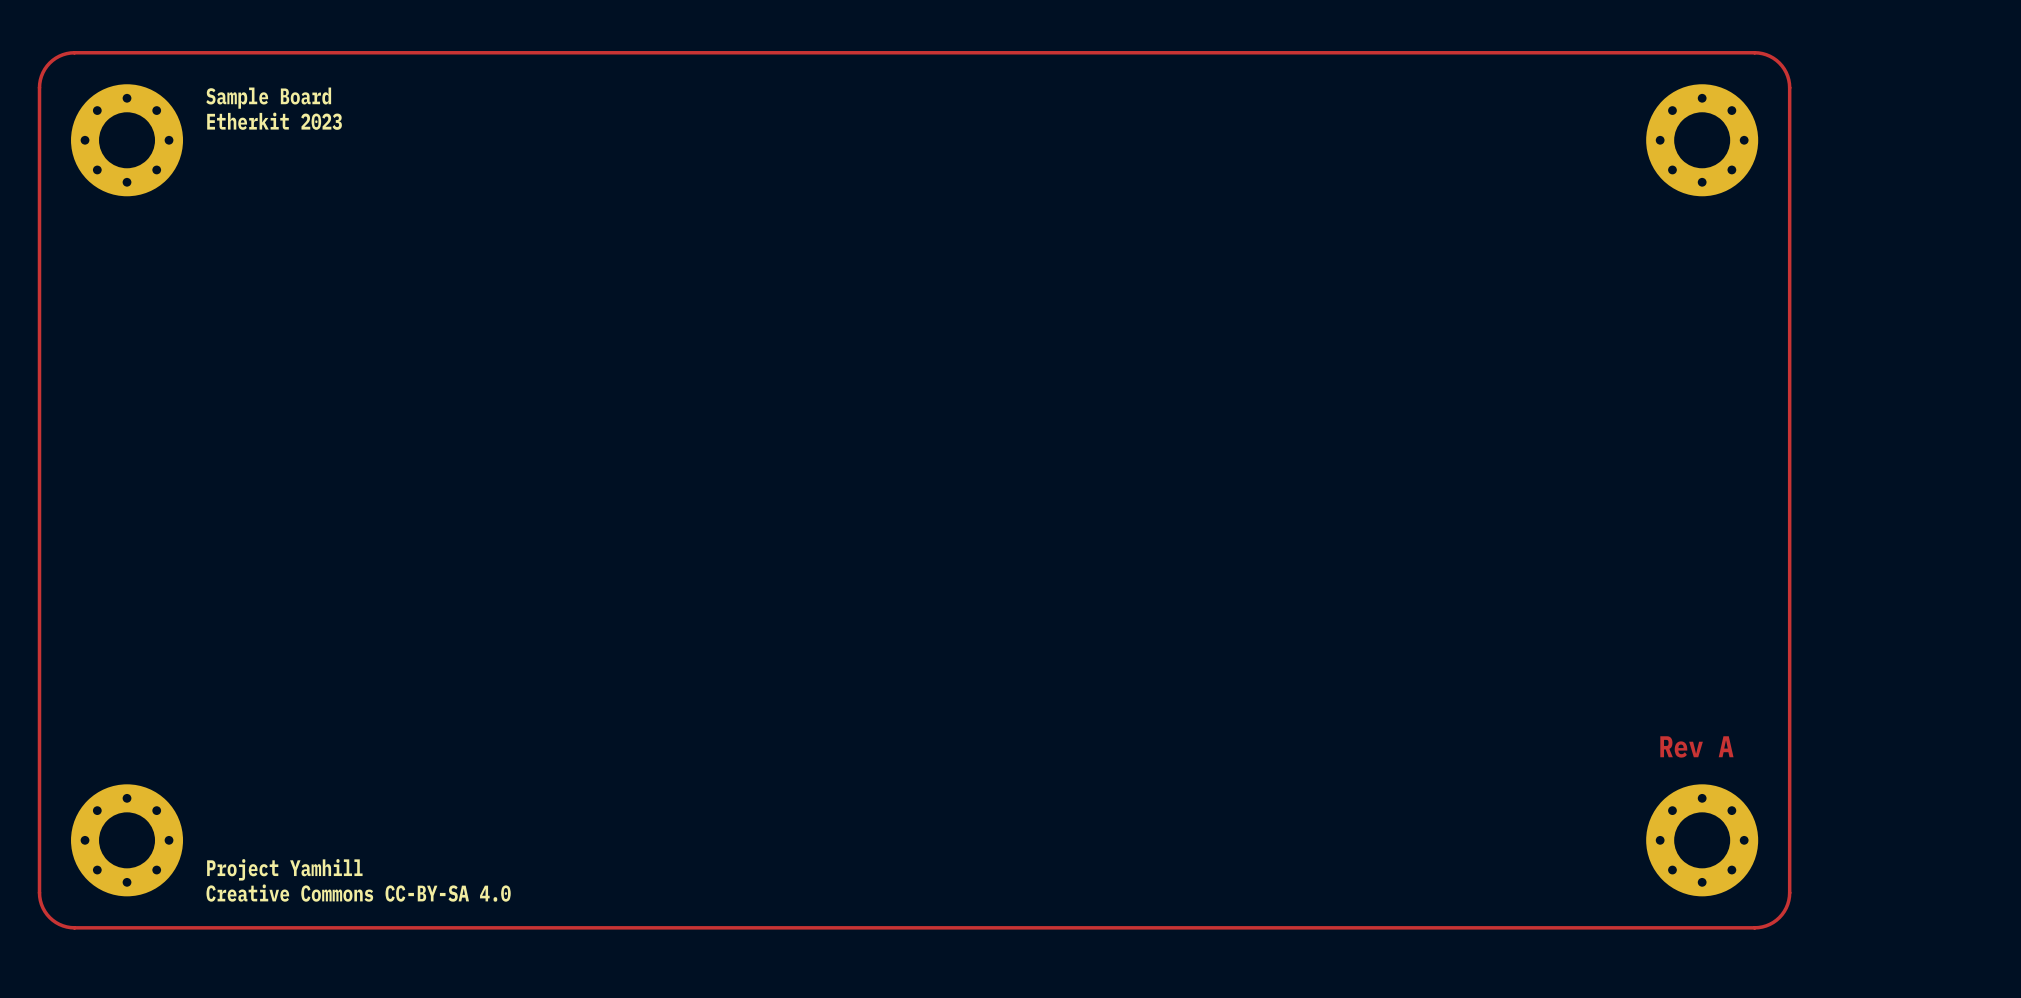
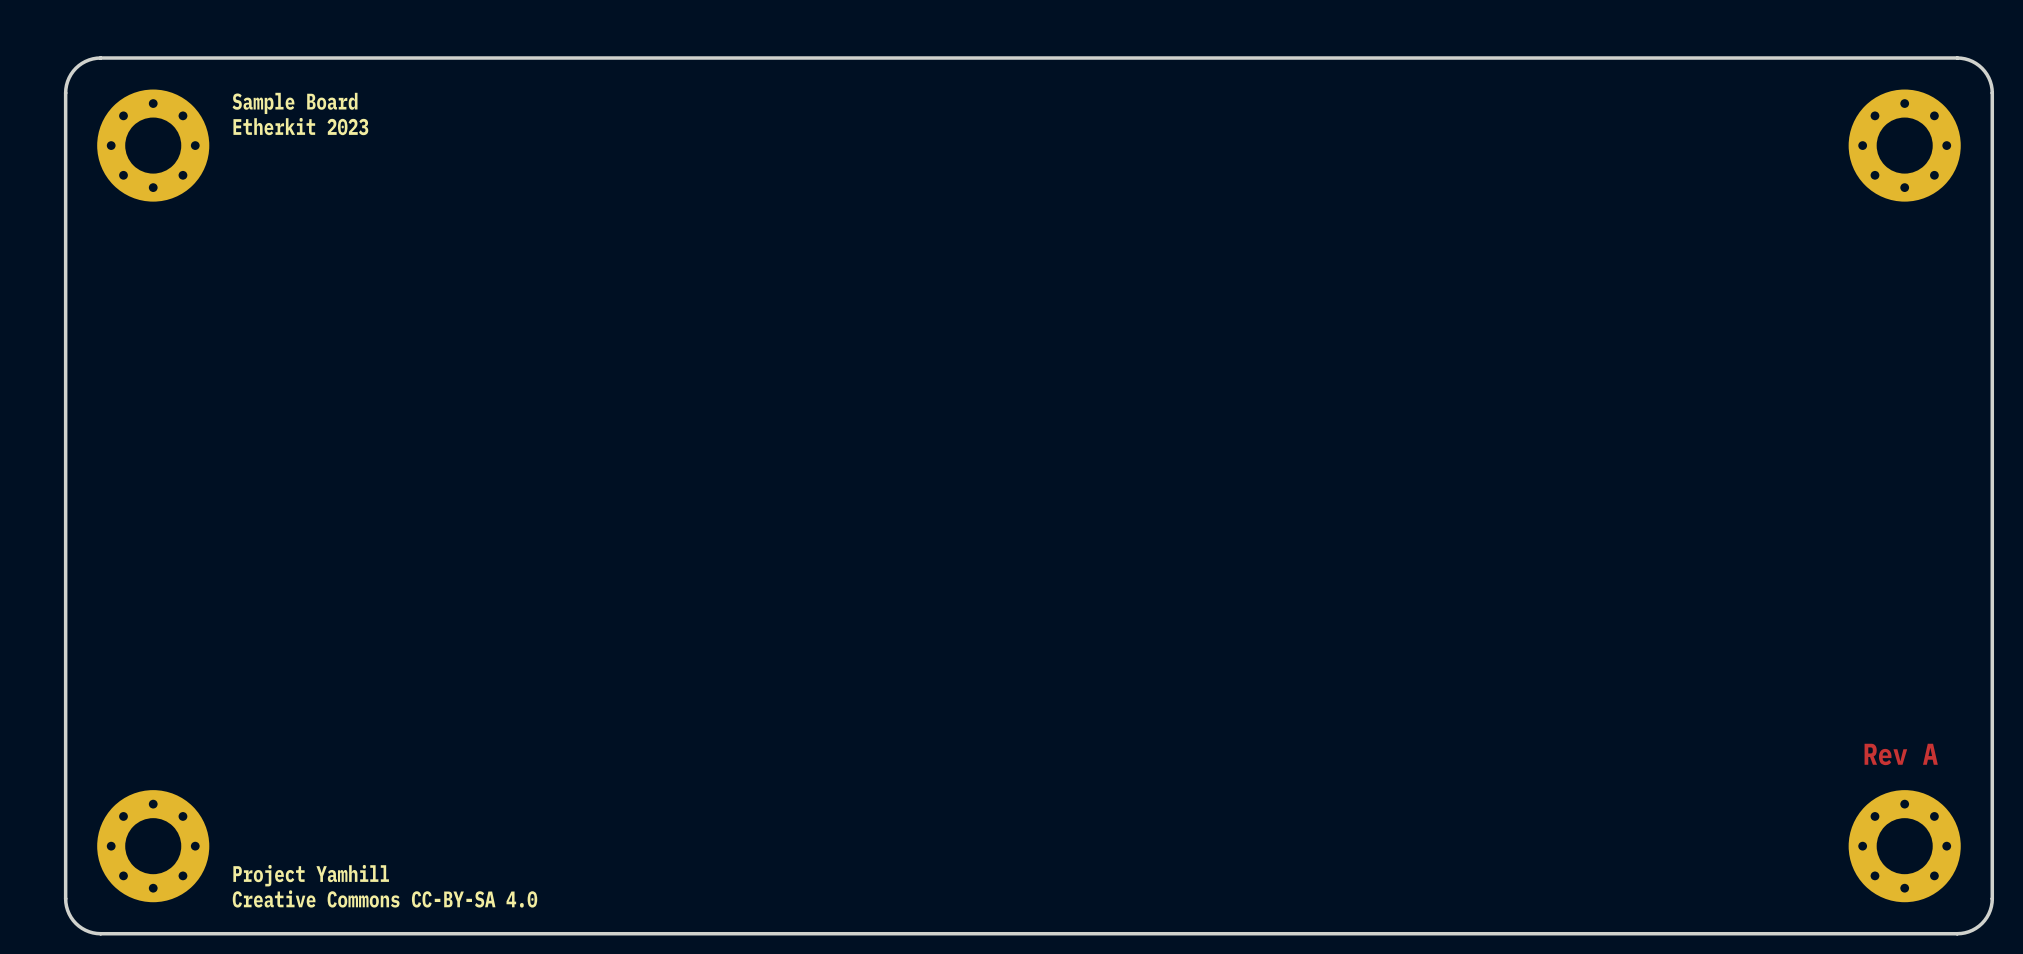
track: (74, 52) (1754, 52) (1769, 56) (1784, 69) (1789, 87) (1789, 892) (1786, 908) (1773, 922) (1754, 927) (74, 927) (59, 924) (44, 911) (39, 892) (39, 87) (42, 72) (49, 63) (62, 54) (74, 52) -> none
board edge: none -> (100, 58) (1957, 58) (1972, 61) (1986, 74) (1992, 93) (1992, 898) (1988, 913) (1975, 928) (1957, 933) (100, 933) (85, 930) (71, 917) (65, 898) (65, 93) (69, 77) (75, 68) (89, 59) (100, 58)
part position: (1702, 140) -> (1904, 145)
text position: Rev A (1696, 746) -> Rev A (1901, 754)
part position: (1702, 840) -> (1904, 846)

